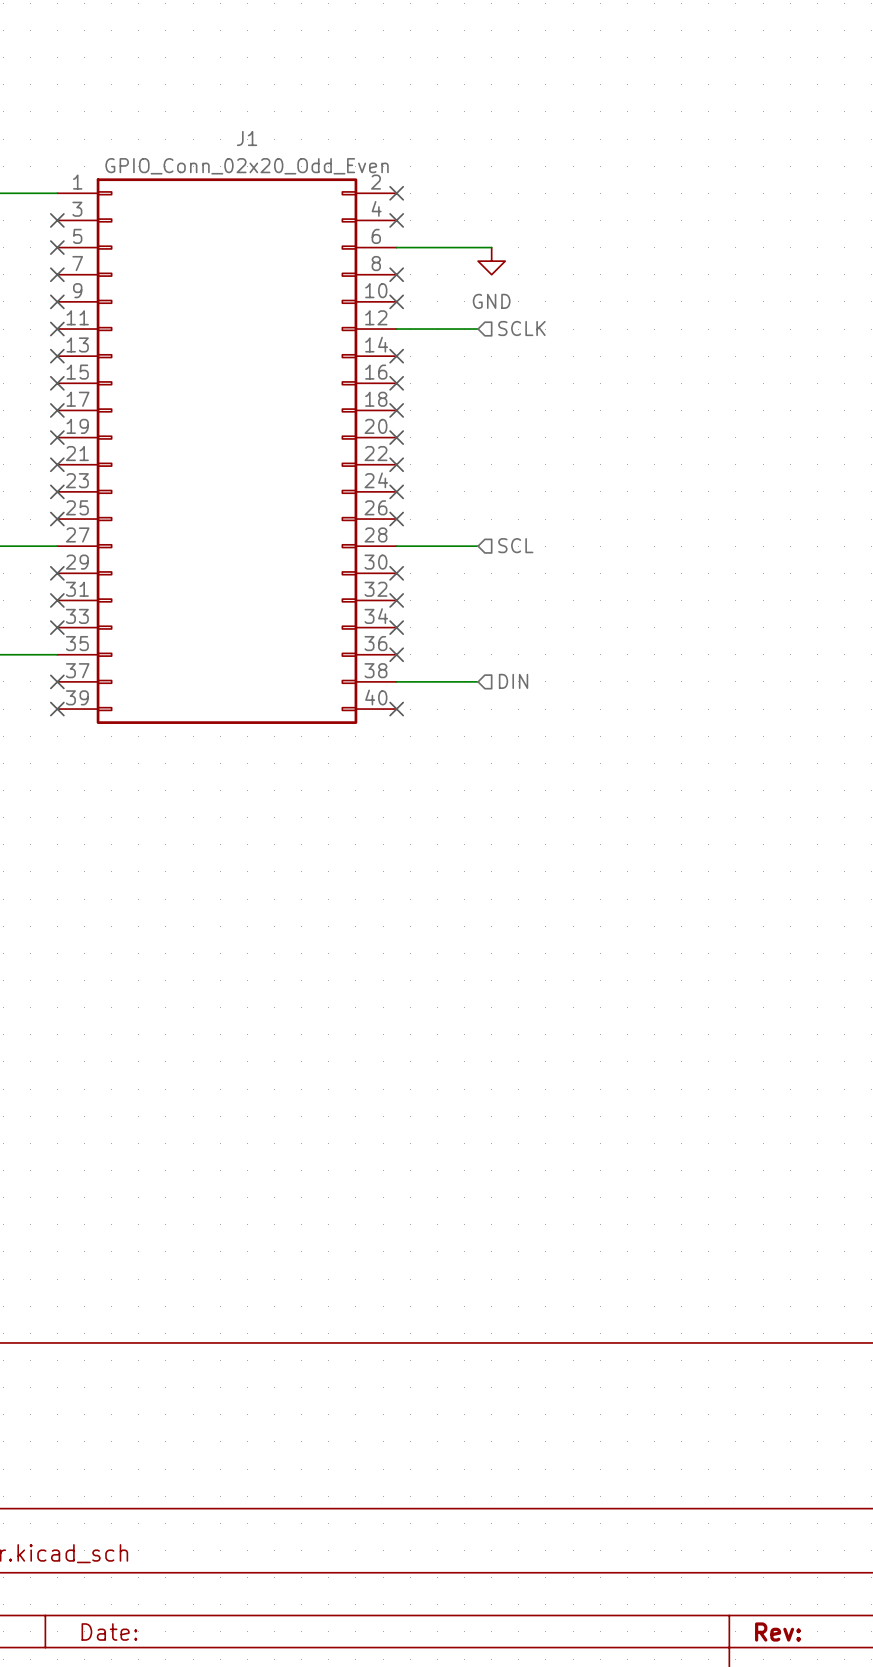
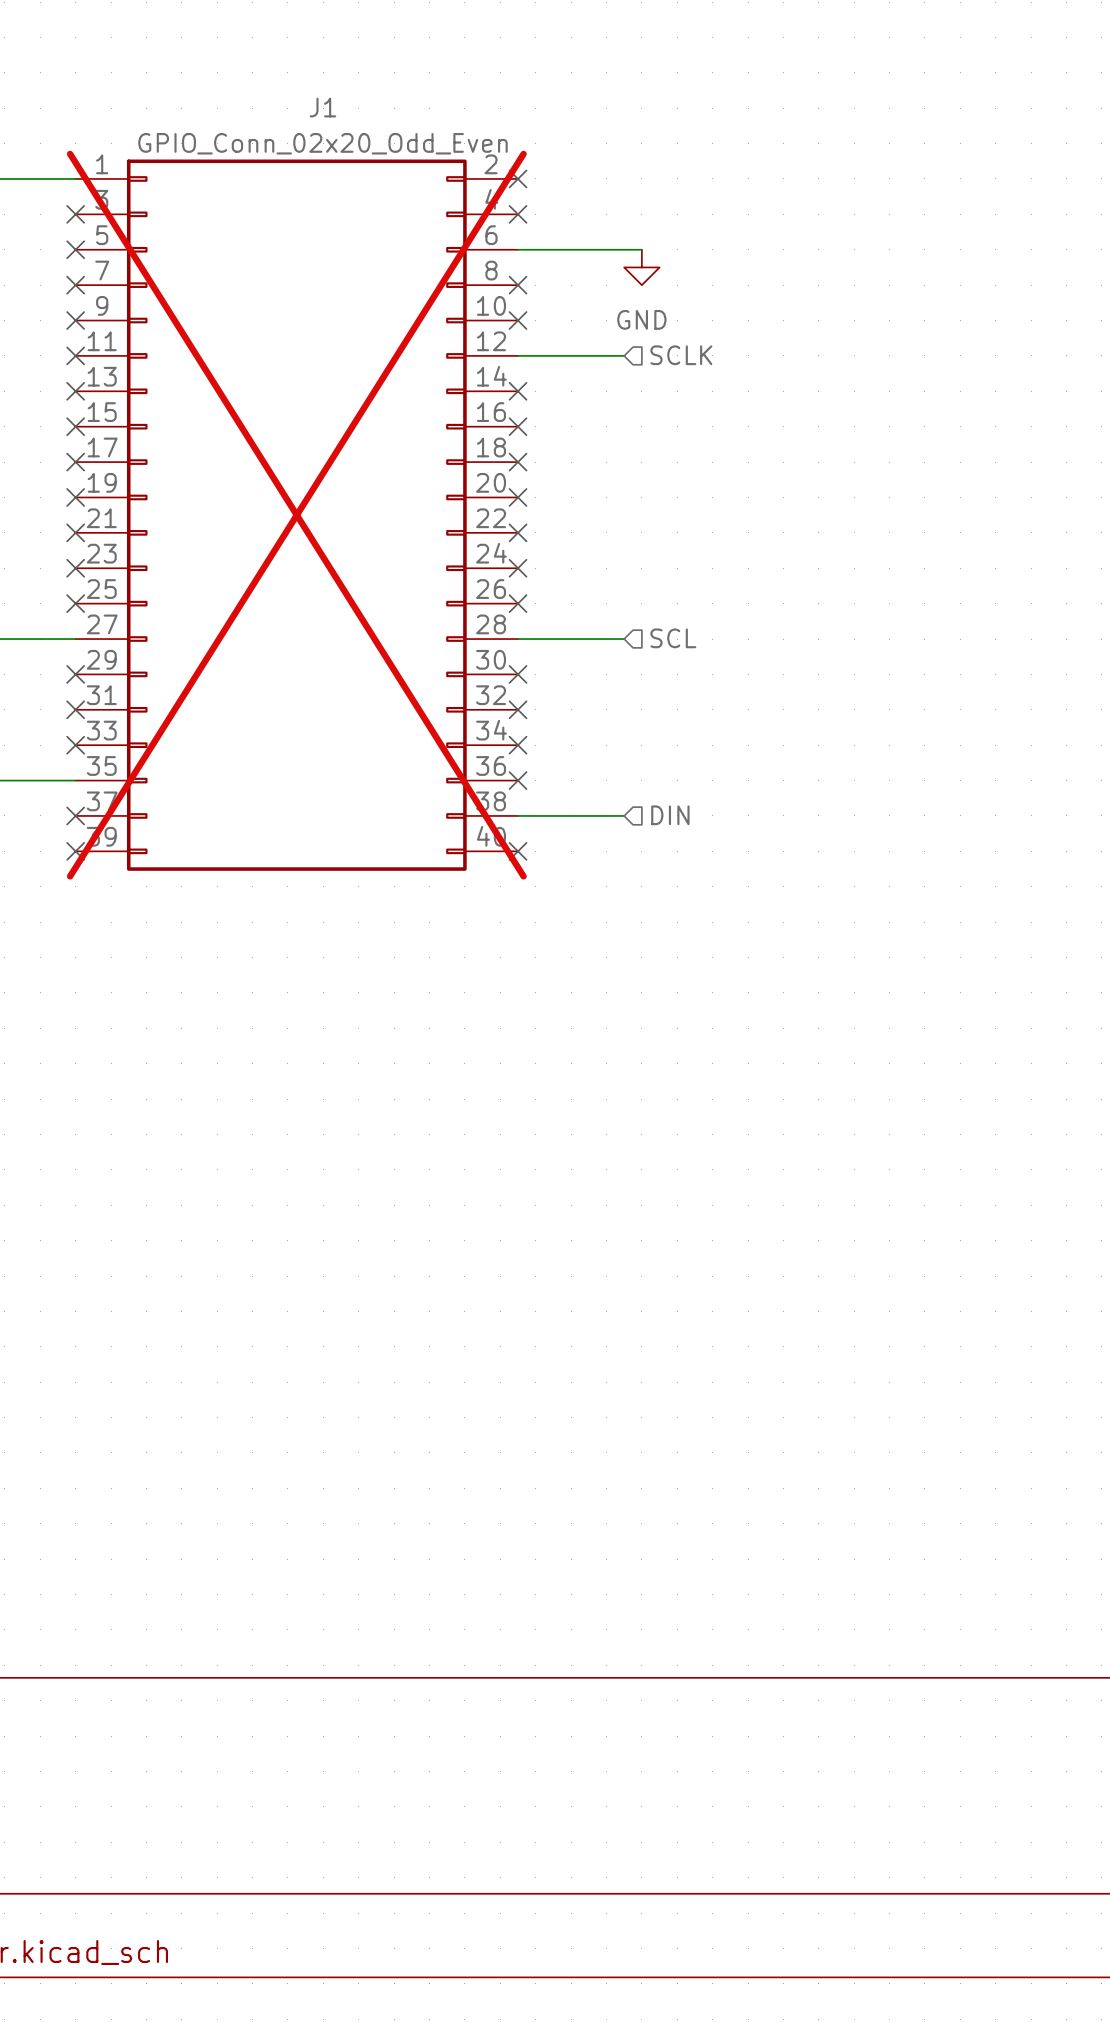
J1 do-not-place cross: none -> (296, 515)

